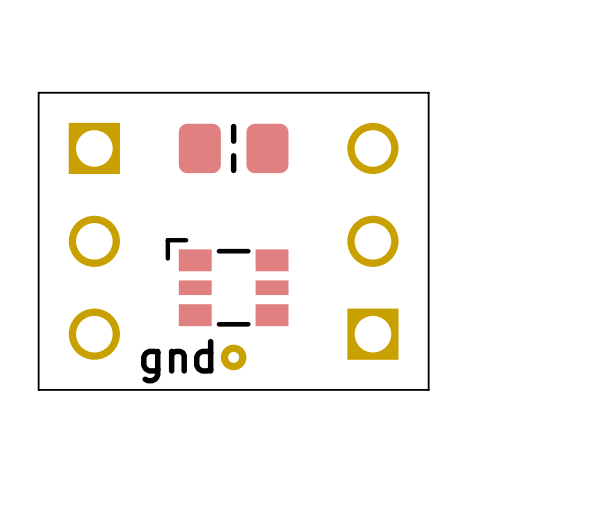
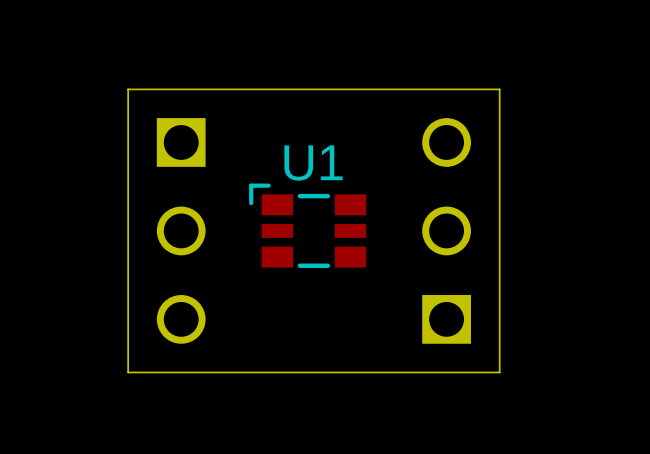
part: (233, 148) -> none
U1: none -> (307, 225)
part: (227, 282) -> none
part: gnd (233, 357) -> none

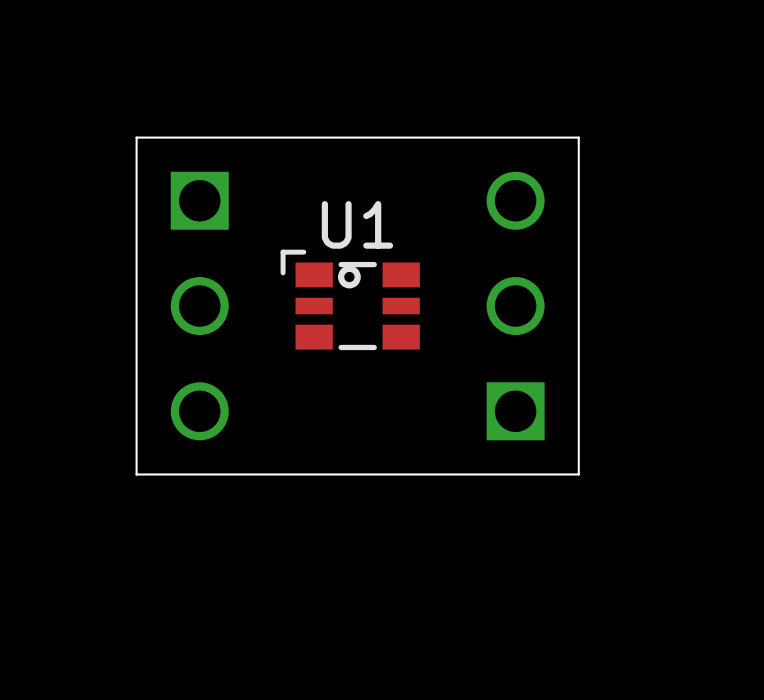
U1 footprint: [249, 183, 367, 268] -> [280, 249, 420, 351]

